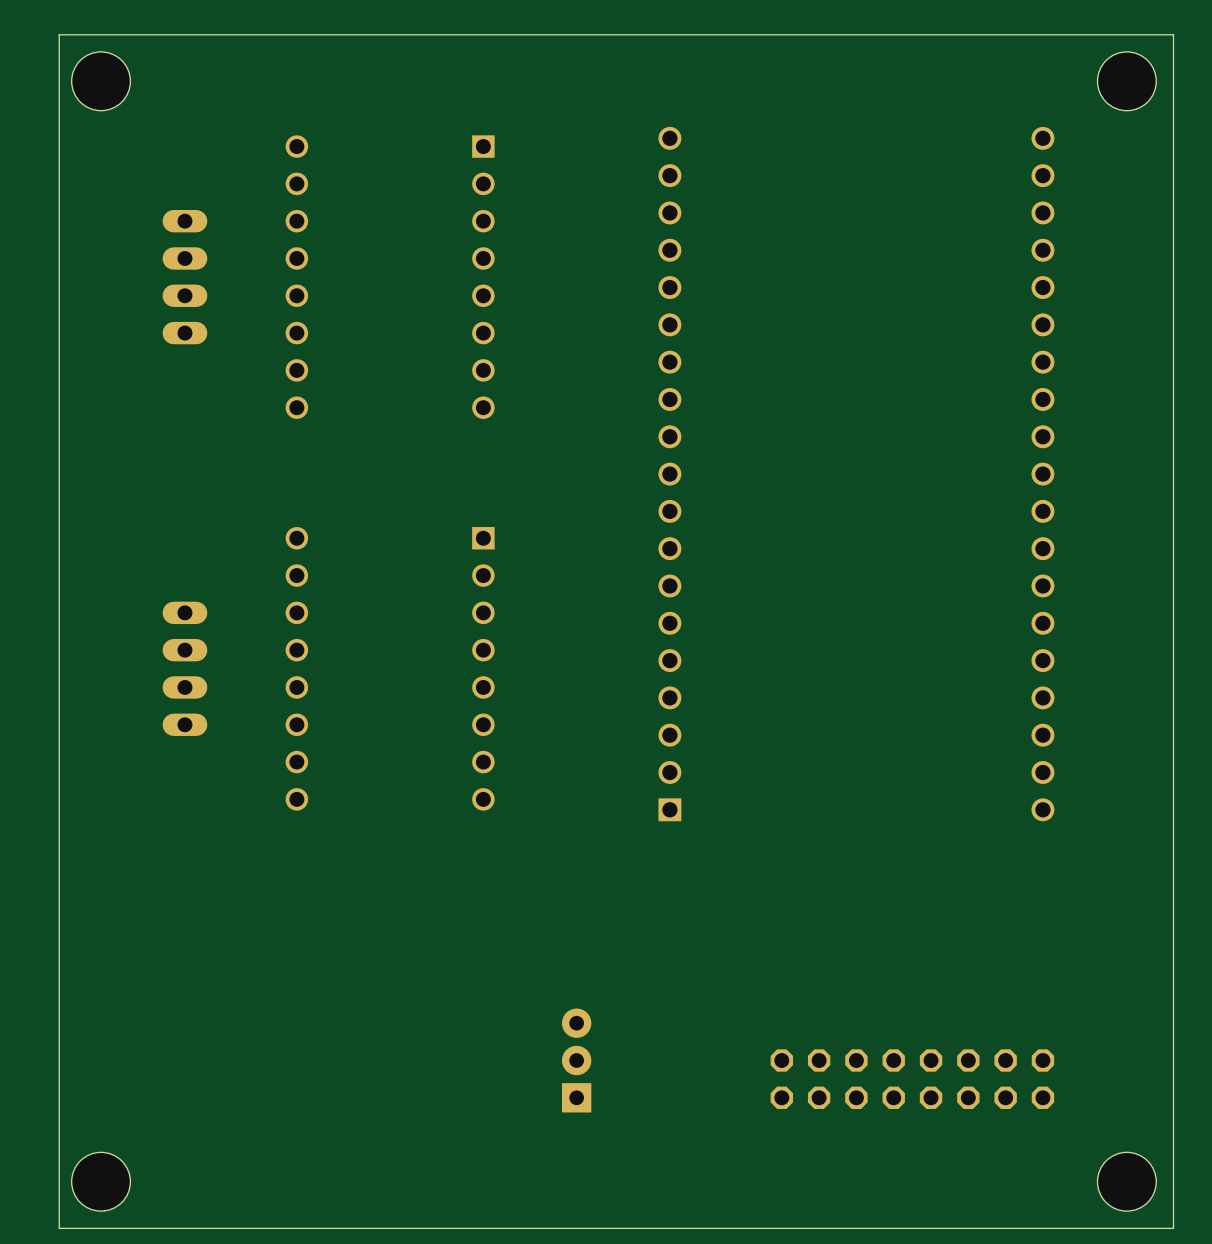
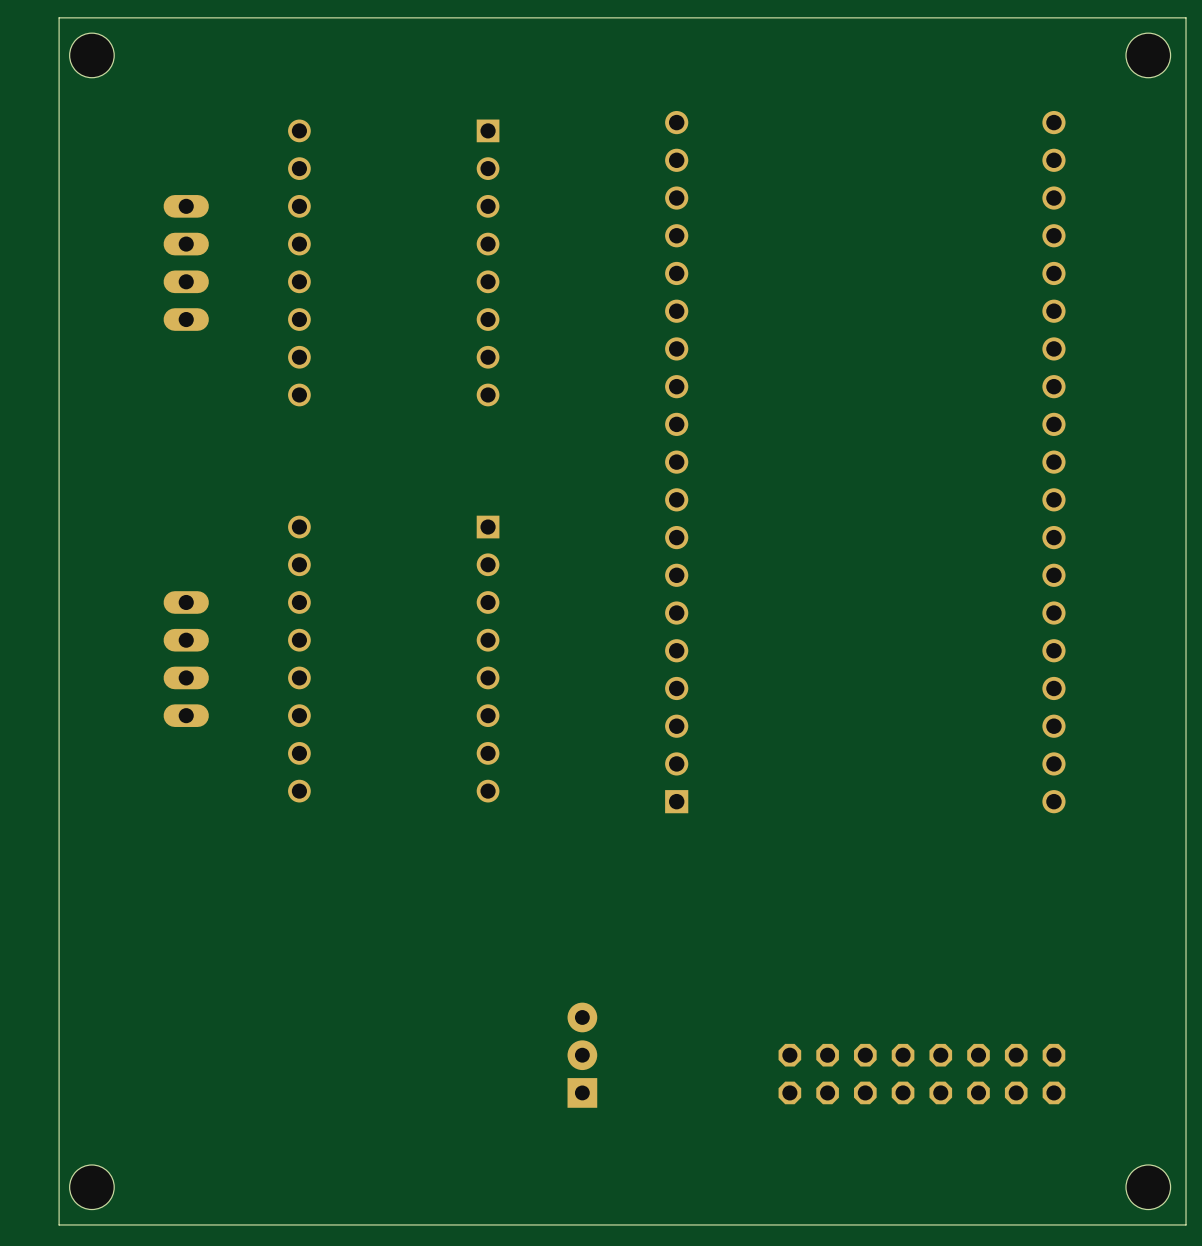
hole size: [71, 51, 131, 111] -> [69, 33, 115, 78]
hole size: [1097, 51, 1157, 111] -> [1126, 33, 1171, 78]
hole size: [71, 1152, 131, 1212] -> [69, 1164, 115, 1210]
hole size: [1097, 1152, 1157, 1212] -> [1126, 1164, 1171, 1210]

